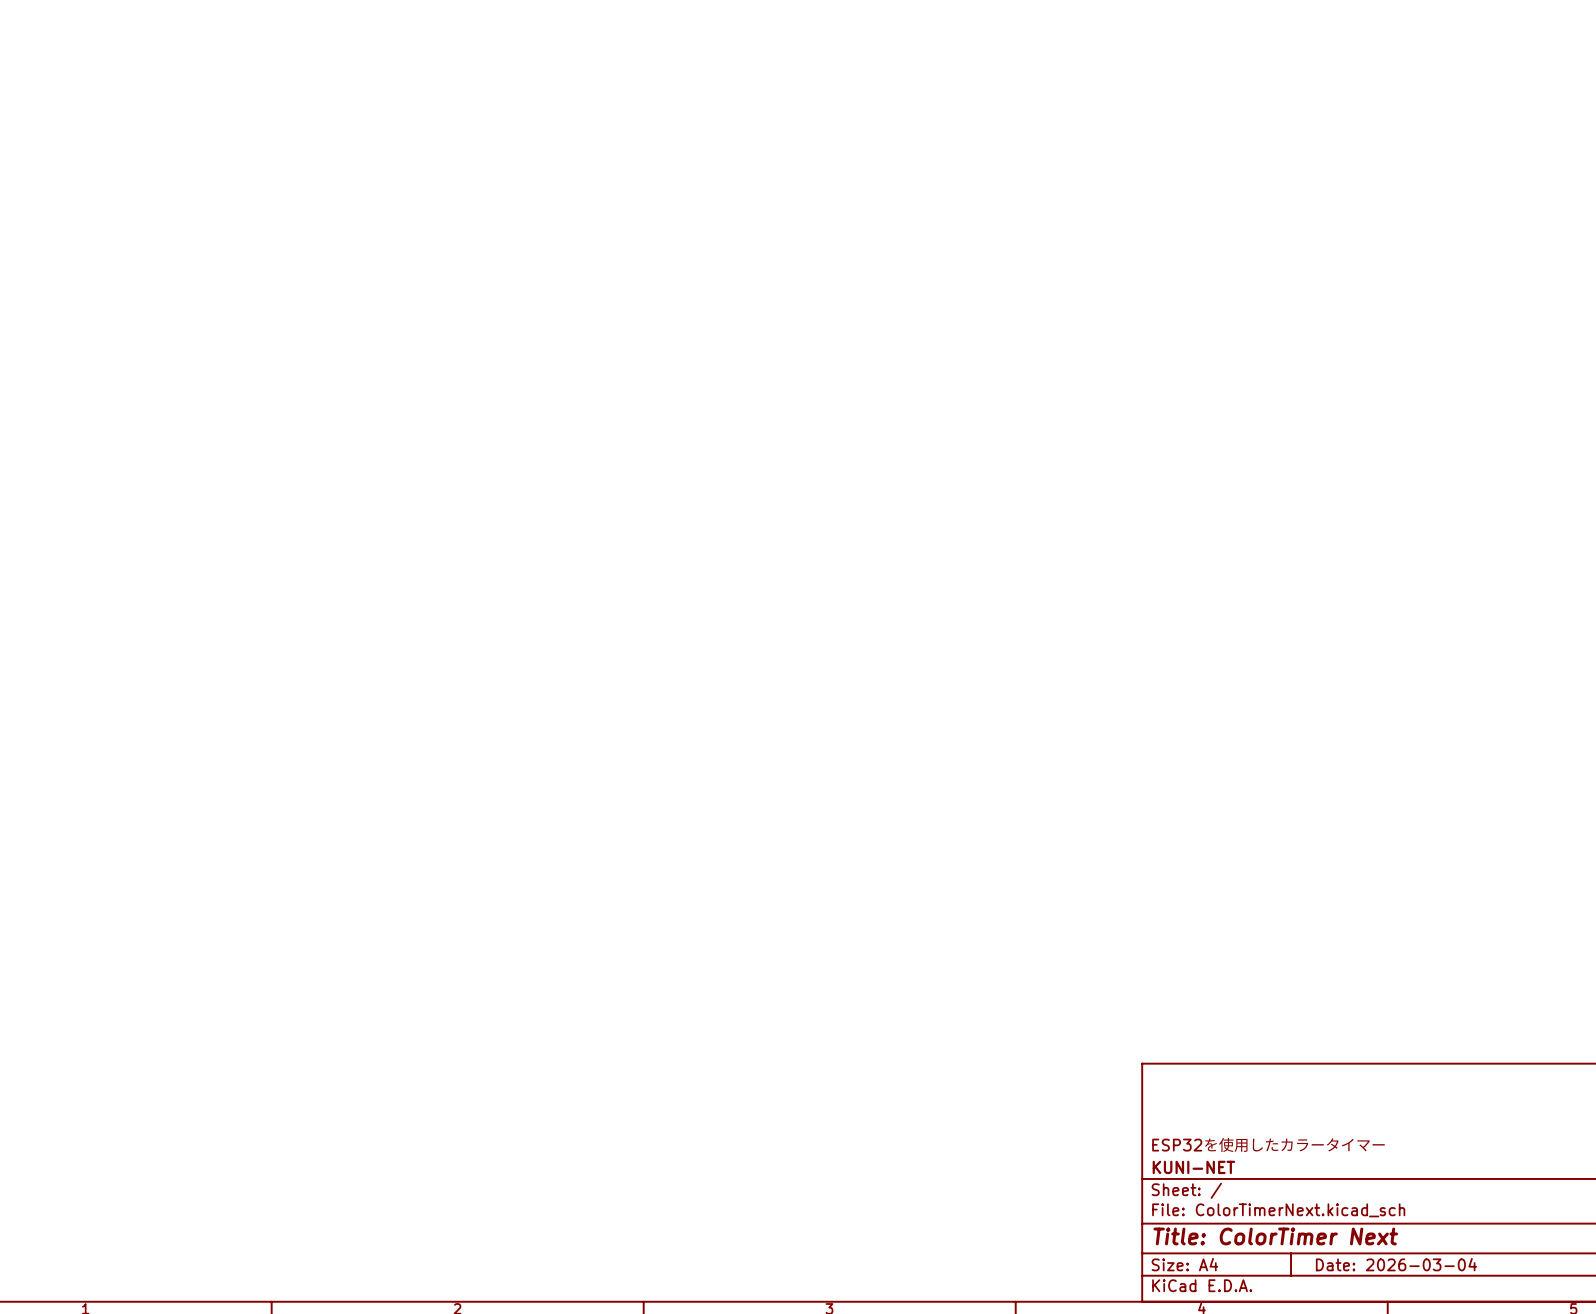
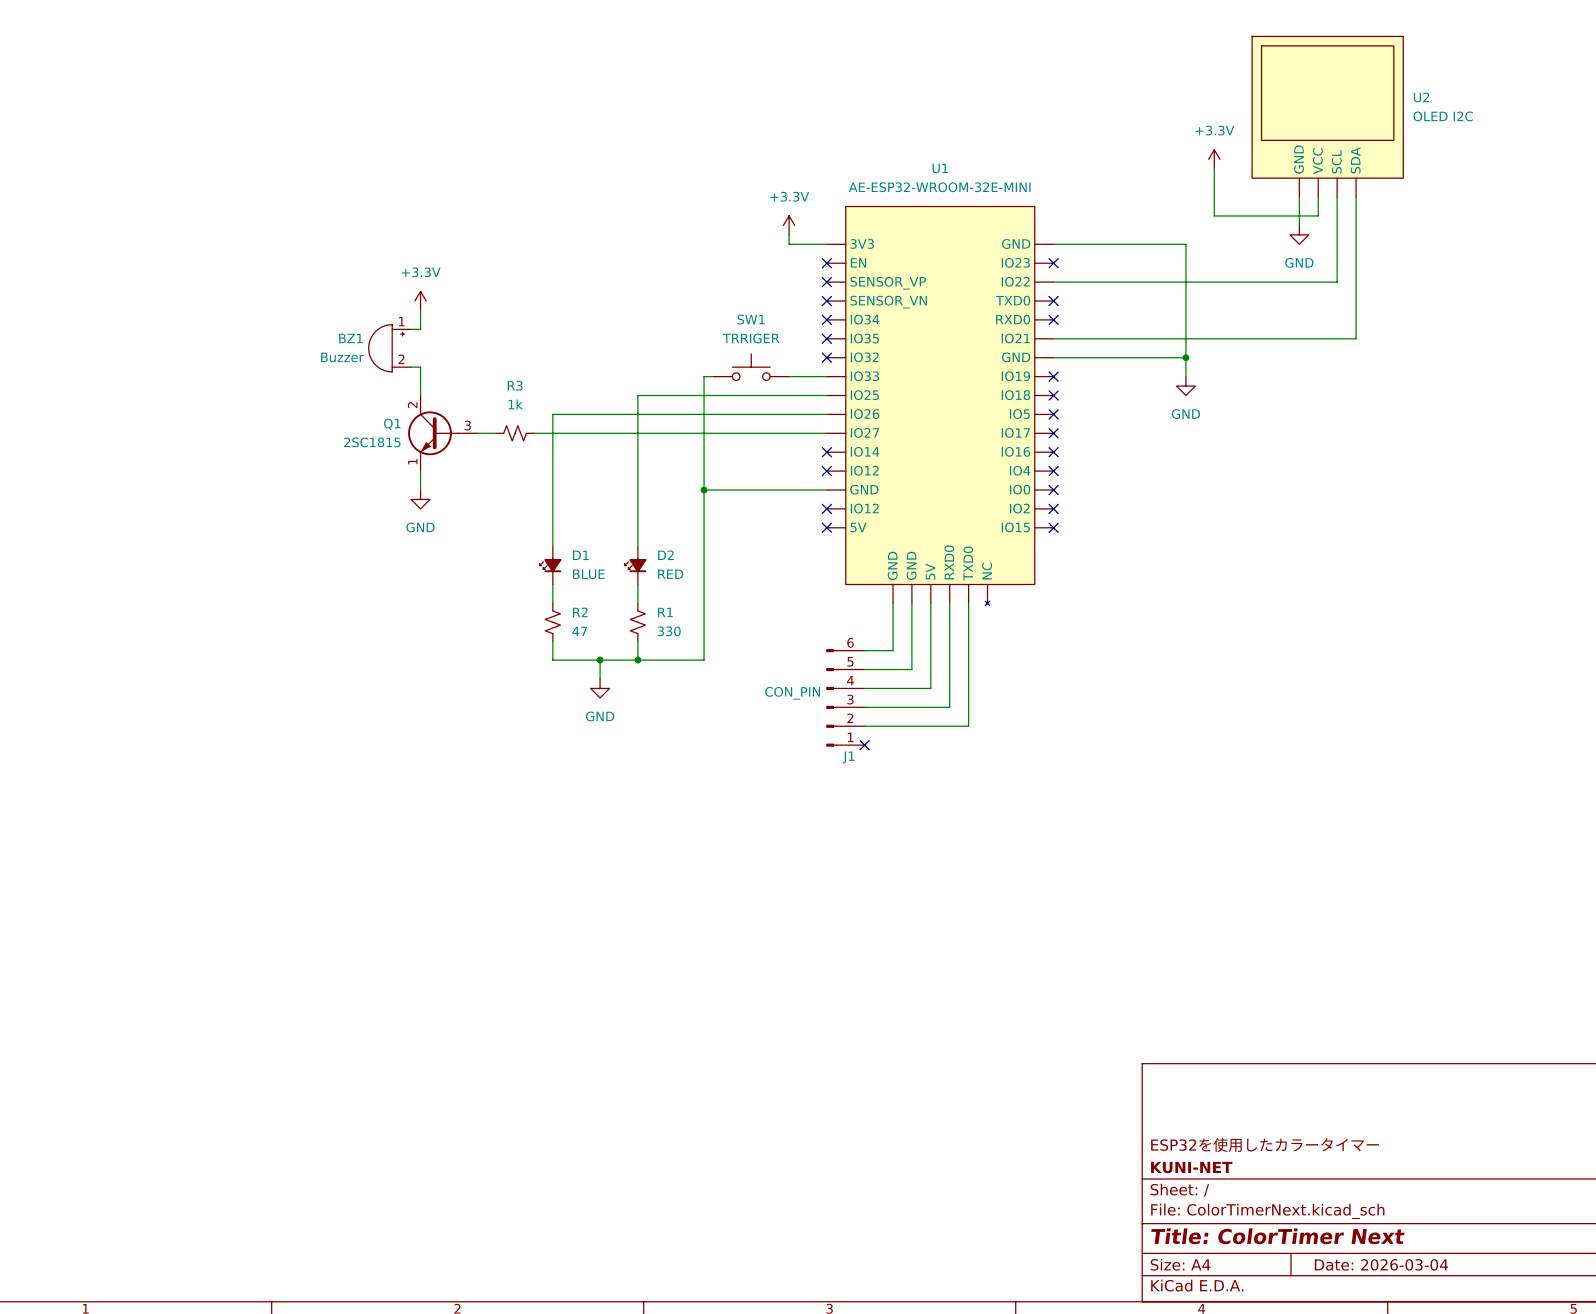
U2: none -> OLED I2C (1327, 116)
power symbol: none -> +3.3V (1214, 159)
wire: none -> (1214, 168) (1214, 215) (1318, 215) (1318, 197)
wire: none -> (1299, 197) (1299, 225)
wire: none -> (1337, 197) (1337, 282) (1053, 282)
wire: none -> (1356, 197) (1356, 338) (1053, 338)
power symbol: none -> +3.3V (789, 225)
wire: none -> (789, 234) (789, 244) (826, 244)
power symbol: none -> GND (1299, 234)
wire: none -> (1053, 244) (1185, 244) (1185, 376)
no-connect mark: none -> (826, 263)
no-connect mark: none -> (1053, 263)
no-connect mark: none -> (826, 282)
power symbol: none -> +3.3V (420, 301)
no-connect mark: none -> (826, 301)
no-connect mark: none -> (1053, 301)
wire: none -> (420, 310) (420, 329) (411, 329)
no-connect mark: none -> (826, 319)
no-connect mark: none -> (1053, 319)
no-connect mark: none -> (826, 338)
BZ1: none -> Buzzer (389, 348)
no-connect mark: none -> (826, 357)
wire: none -> (1053, 357) (1185, 357)
junction: none -> (1185, 357)
wire: none -> (411, 367) (420, 367) (420, 395)
SW1: none -> TRRIGER (751, 367)
wire: none -> (713, 376) (704, 376) (704, 660) (552, 660) (552, 641)
wire: none -> (789, 376) (826, 376)
no-connect mark: none -> (1053, 376)
power symbol: none -> GND (1185, 386)
wire: none -> (826, 395) (637, 395) (637, 546)
no-connect mark: none -> (1053, 395)
U1: none -> AE-ESP32-WROOM-32E-MINI (940, 406)
wire: none -> (826, 414) (552, 414) (552, 546)
no-connect mark: none -> (1053, 414)
Q1: none -> 2SC1815 (442, 433)
wire: none -> (477, 433) (496, 433)
R3: none -> 1k (515, 433)
wire: none -> (533, 433) (826, 433)
no-connect mark: none -> (1053, 433)
no-connect mark: none -> (826, 452)
no-connect mark: none -> (1053, 452)
wire: none -> (420, 471) (420, 490)
no-connect mark: none -> (826, 471)
no-connect mark: none -> (1053, 471)
wire: none -> (704, 490) (826, 490)
junction: none -> (704, 490)
no-connect mark: none -> (1053, 490)
power symbol: none -> GND (420, 499)
no-connect mark: none -> (826, 508)
no-connect mark: none -> (1053, 508)
no-connect mark: none -> (826, 527)
no-connect mark: none -> (1053, 527)
D1: none -> BLUE (550, 565)
D2: none -> RED (635, 565)
wire: none -> (552, 584) (552, 603)
wire: none -> (637, 584) (637, 603)
wire: none -> (893, 603) (893, 650) (864, 650)
wire: none -> (911, 603) (911, 669) (864, 669)
wire: none -> (930, 603) (930, 688) (864, 688)
wire: none -> (949, 603) (949, 707) (864, 707)
wire: none -> (968, 603) (968, 726) (864, 726)
R2: none -> 47 (552, 622)
R1: none -> 330 (637, 622)
wire: none -> (637, 641) (637, 660)
wire: none -> (600, 660) (600, 678)
junction: none -> (600, 660)
junction: none -> (637, 660)
power symbol: none -> GND (600, 688)
J1: none -> CON_PIN (845, 697)
no-connect mark: none -> (864, 745)

